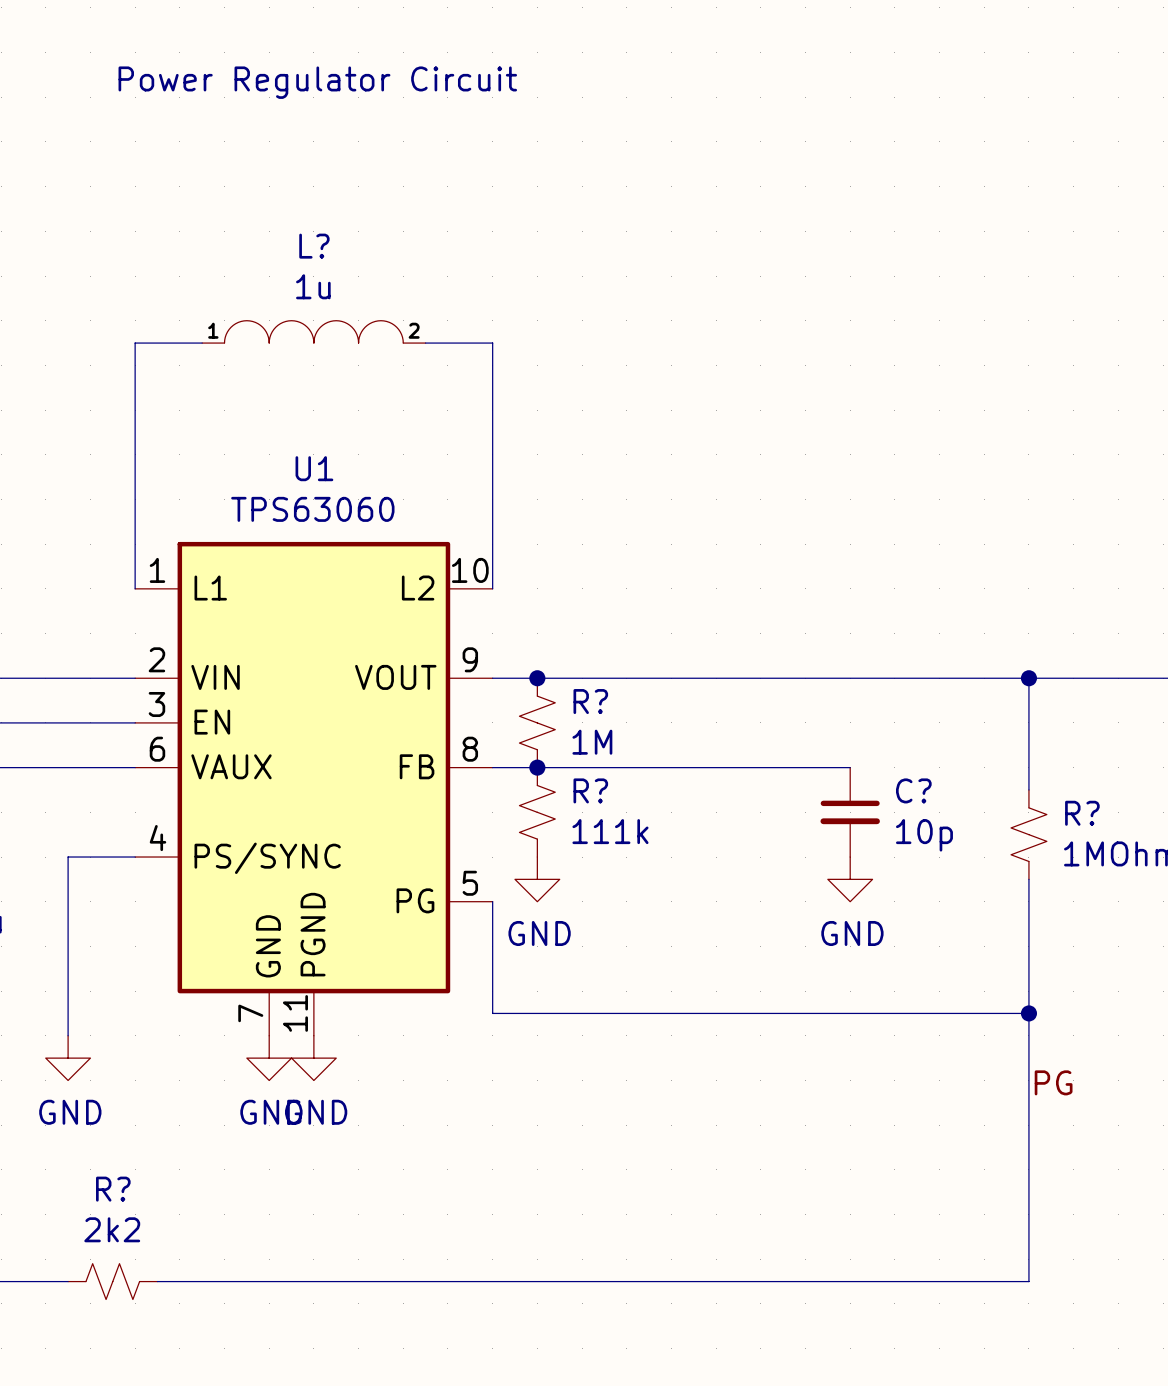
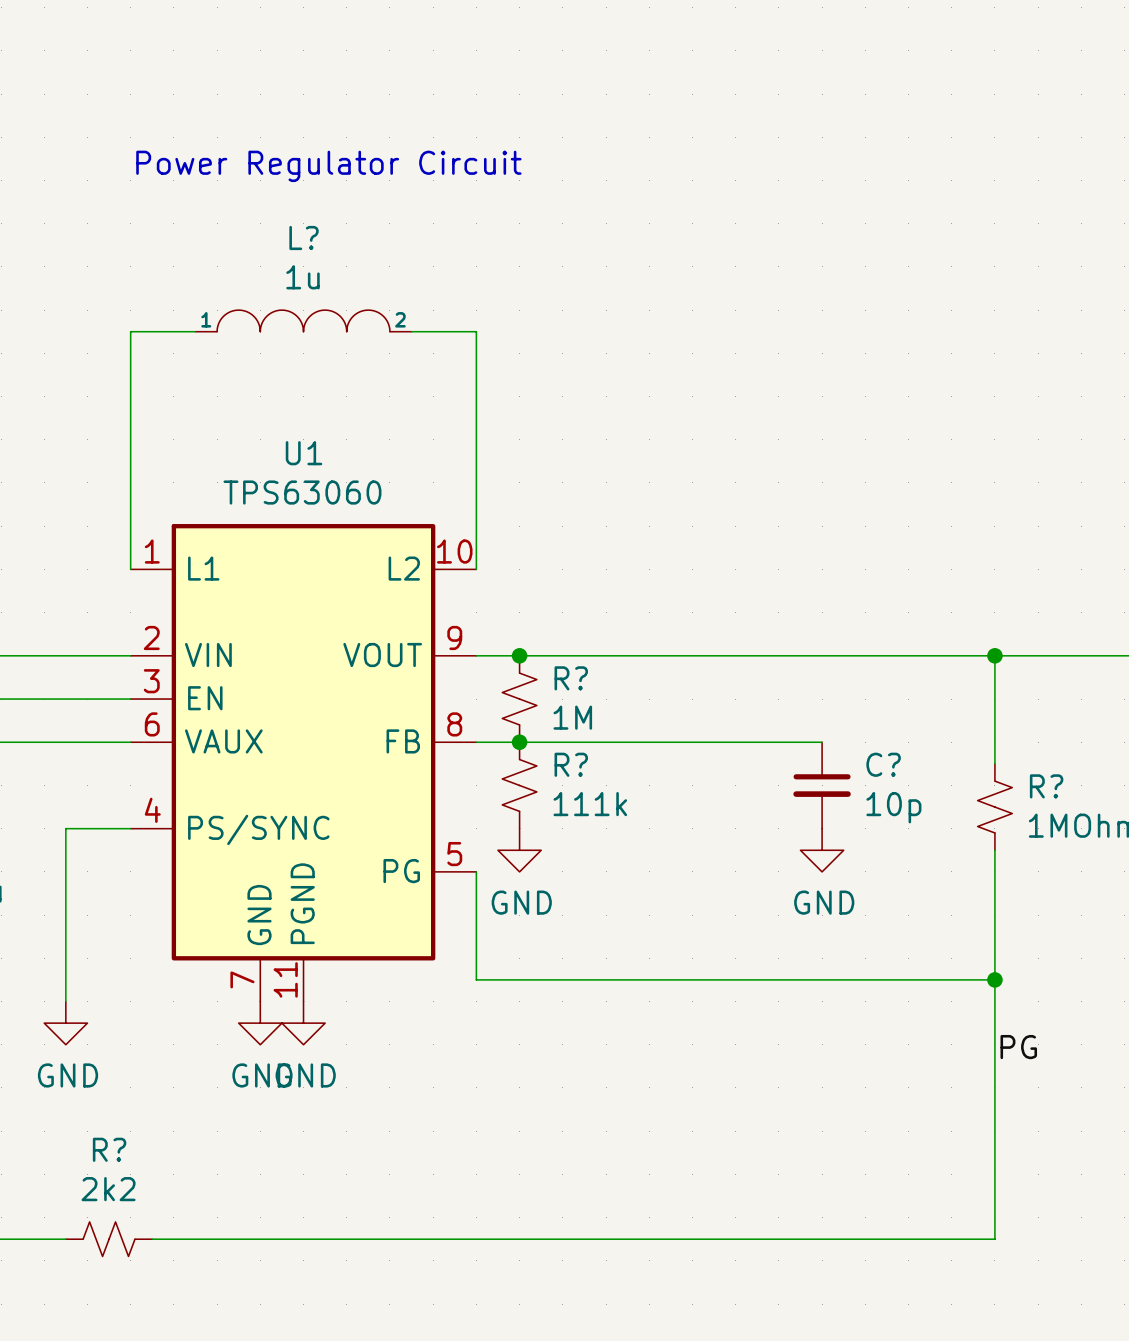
text position: Power Regulator Circuit (317, 82) -> Power Regulator Circuit (328, 166)

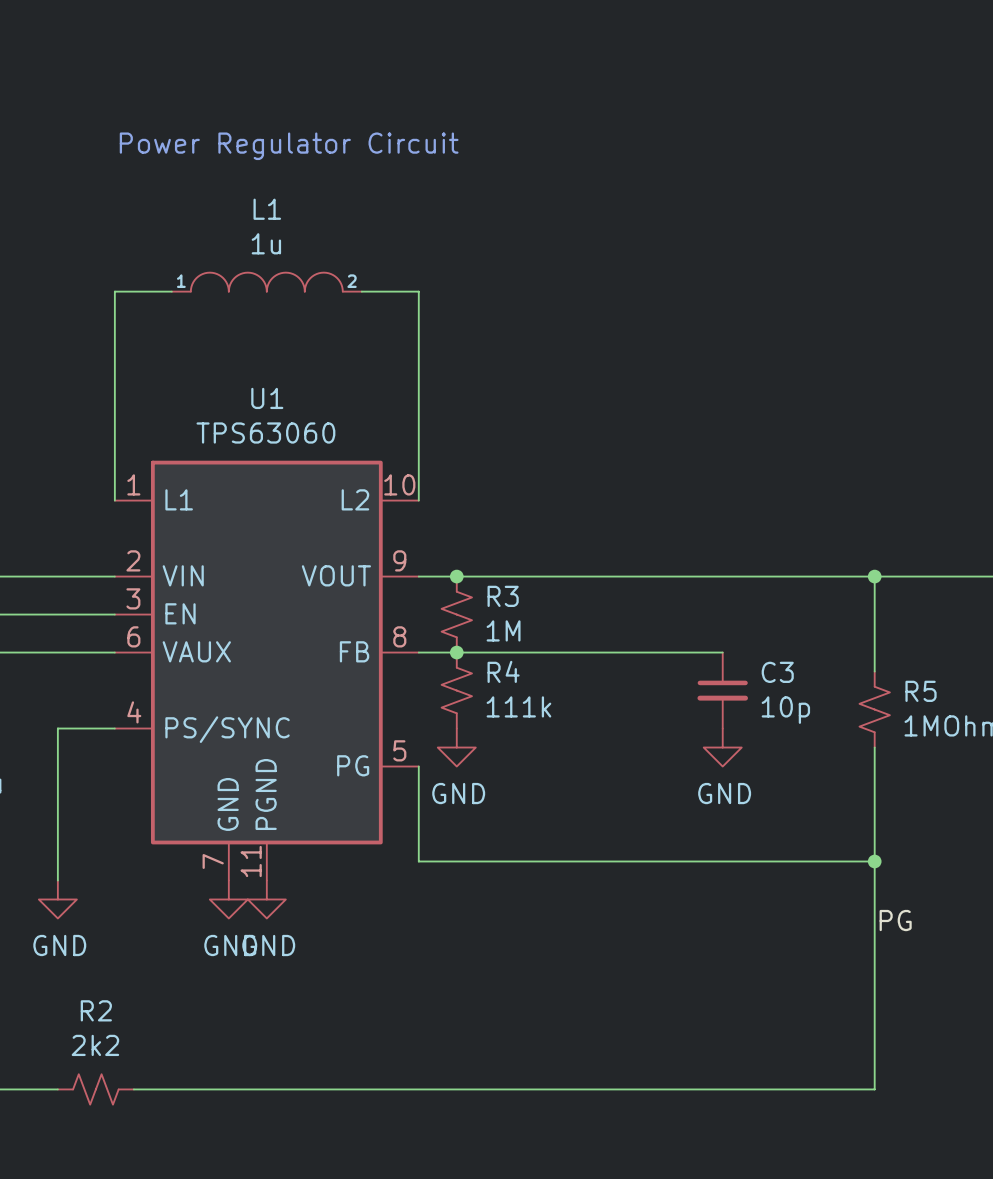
L? name: L? (304, 237) -> L1 (267, 209)
R? name: R? (571, 678) -> R3 (503, 596)
R? name: R? (571, 764) -> R4 (503, 671)
C? name: C? (883, 764) -> C3 (777, 672)
R? name: R? (1046, 786) -> R5 (921, 691)
R? name: R? (109, 1149) -> R2 (96, 1010)

